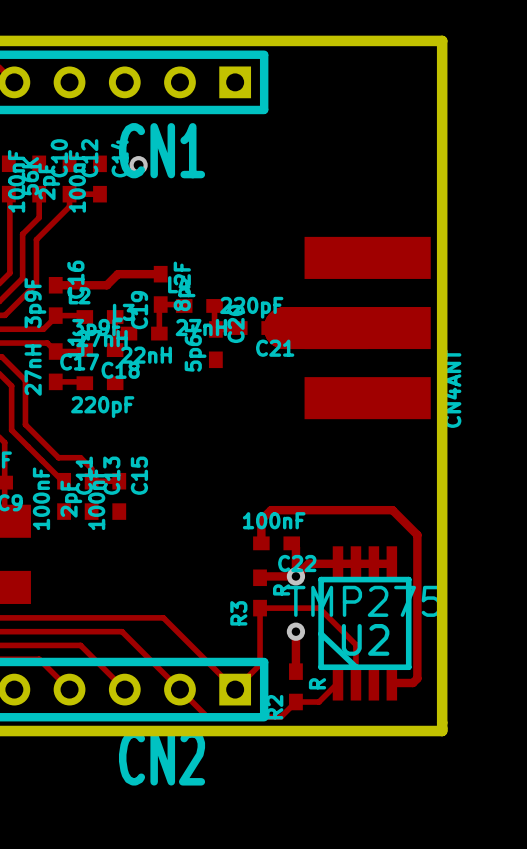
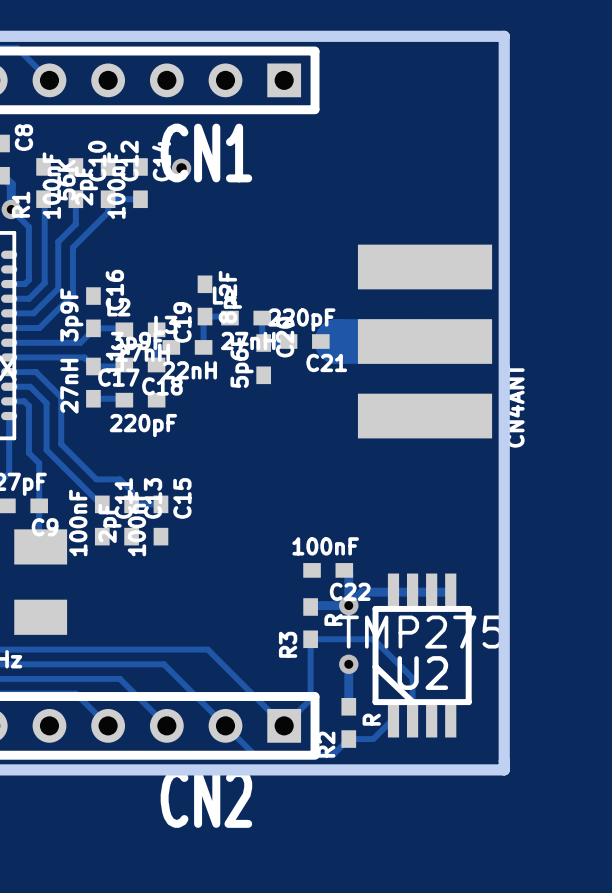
track: (160, 274) (117, 274) (106, 285) (55, 285) -> none
track: (261, 543) (261, 519) (271, 510) (392, 510) (417, 535) (417, 678) (412, 683) (391, 683) -> none

